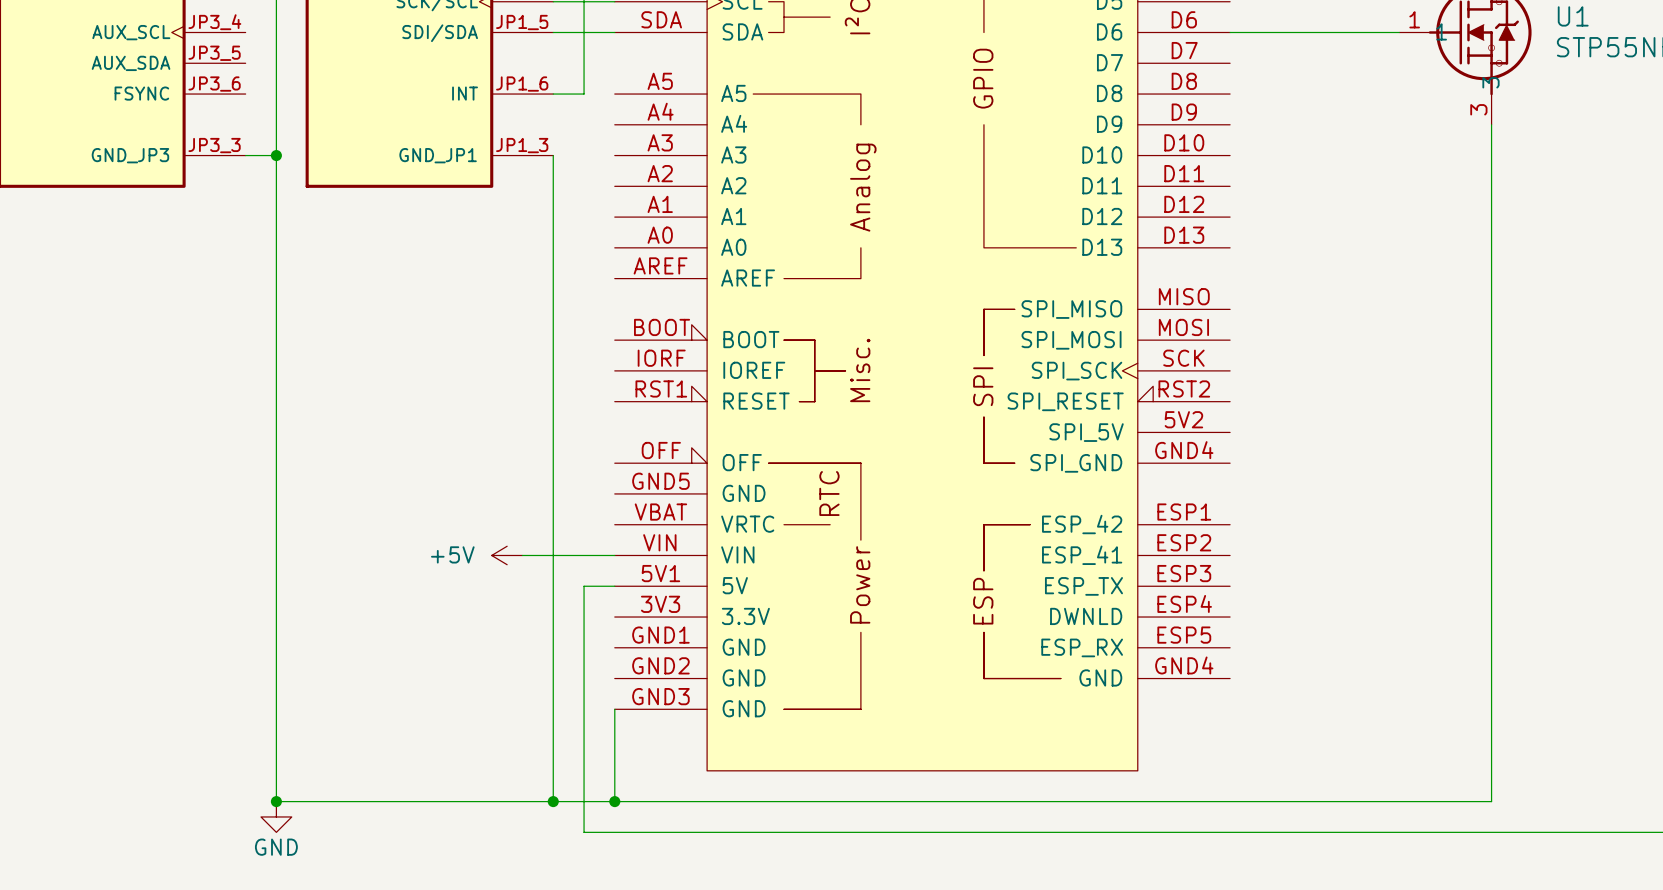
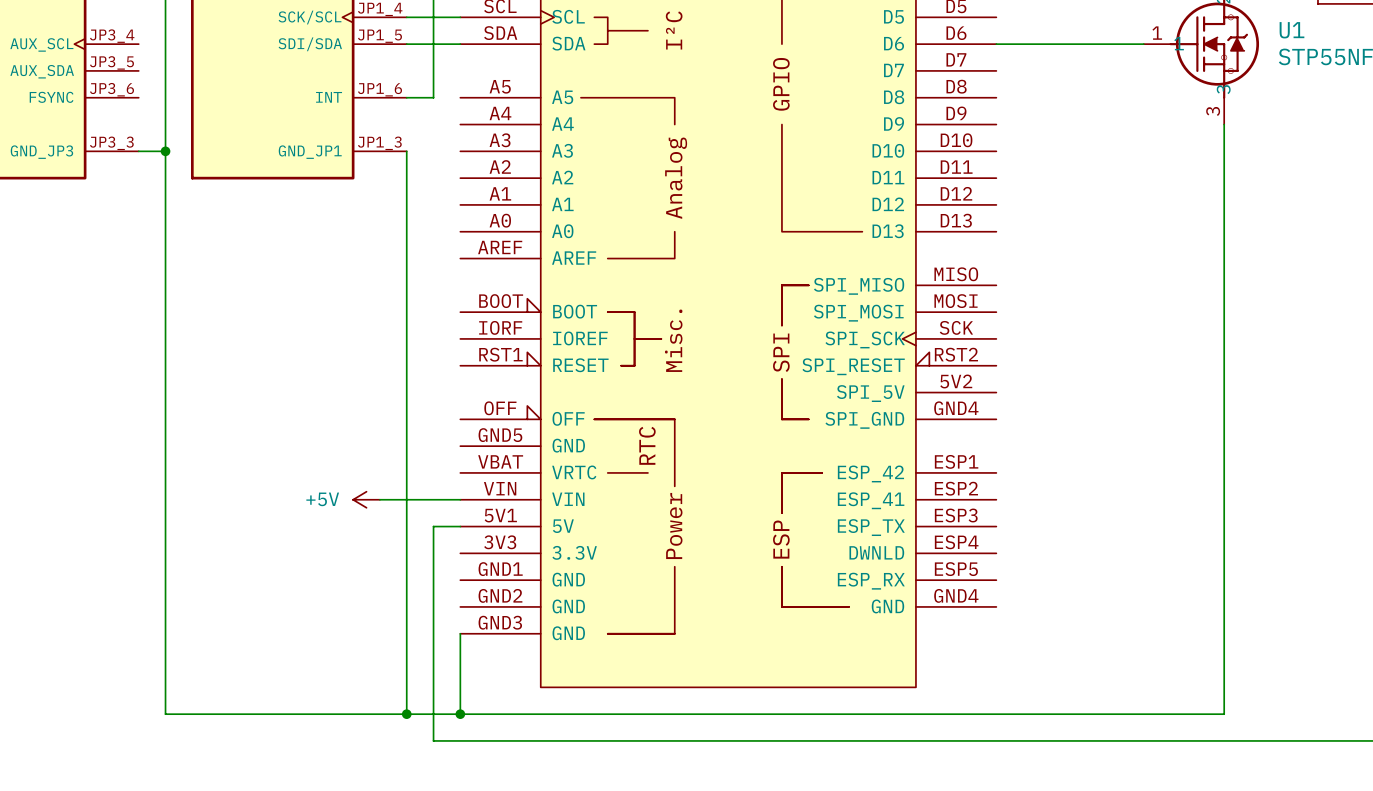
junction: (276, 801) -> none
power symbol: GND (276, 816) -> none

